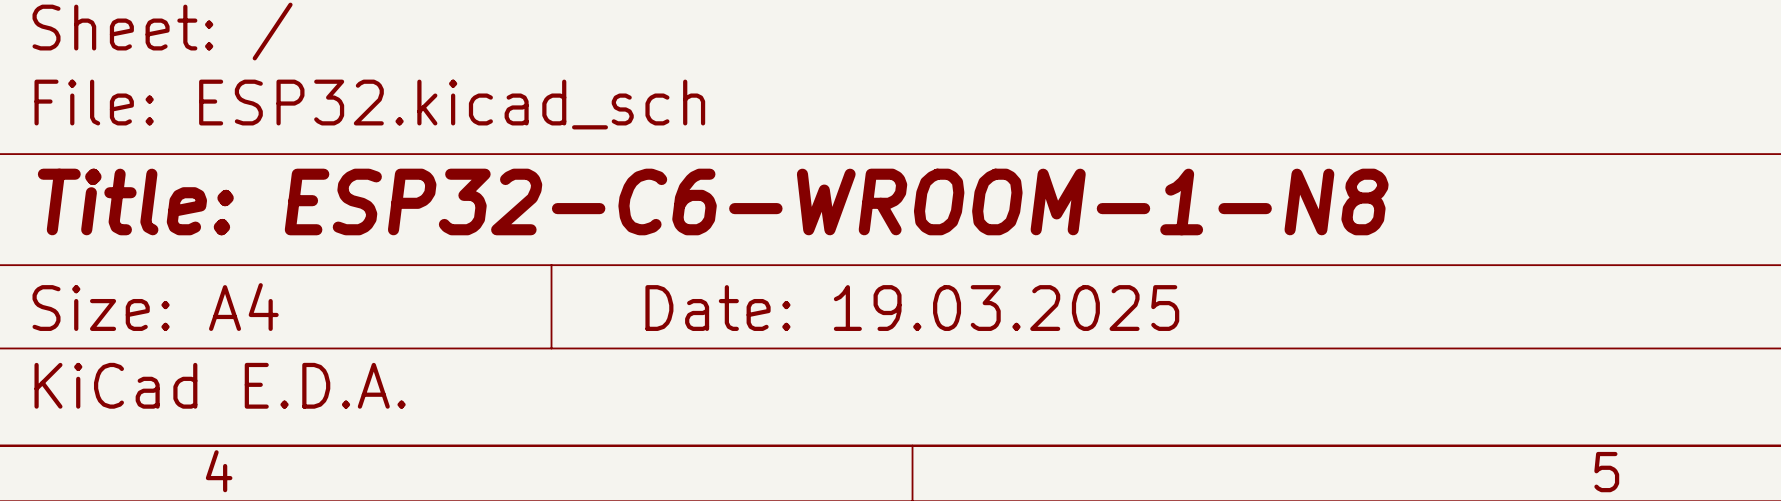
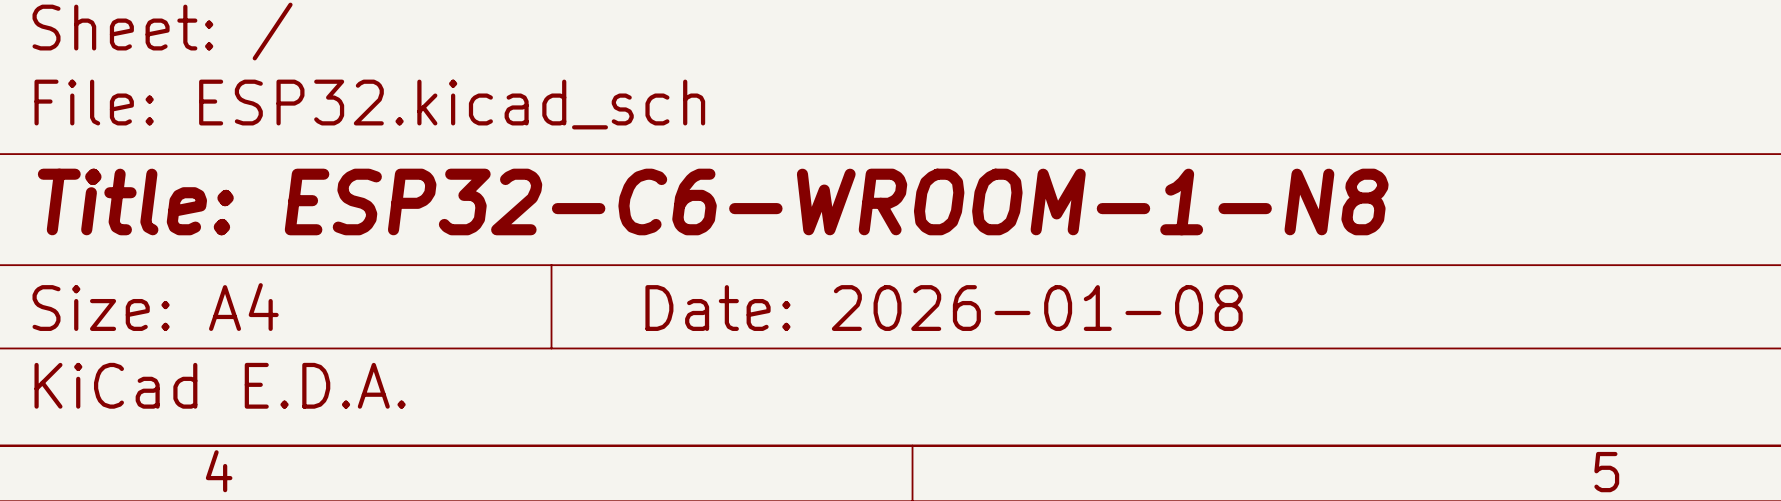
title block: Date: 19.03.2025 (912, 308) -> Date: 2026-01-08 (944, 308)

